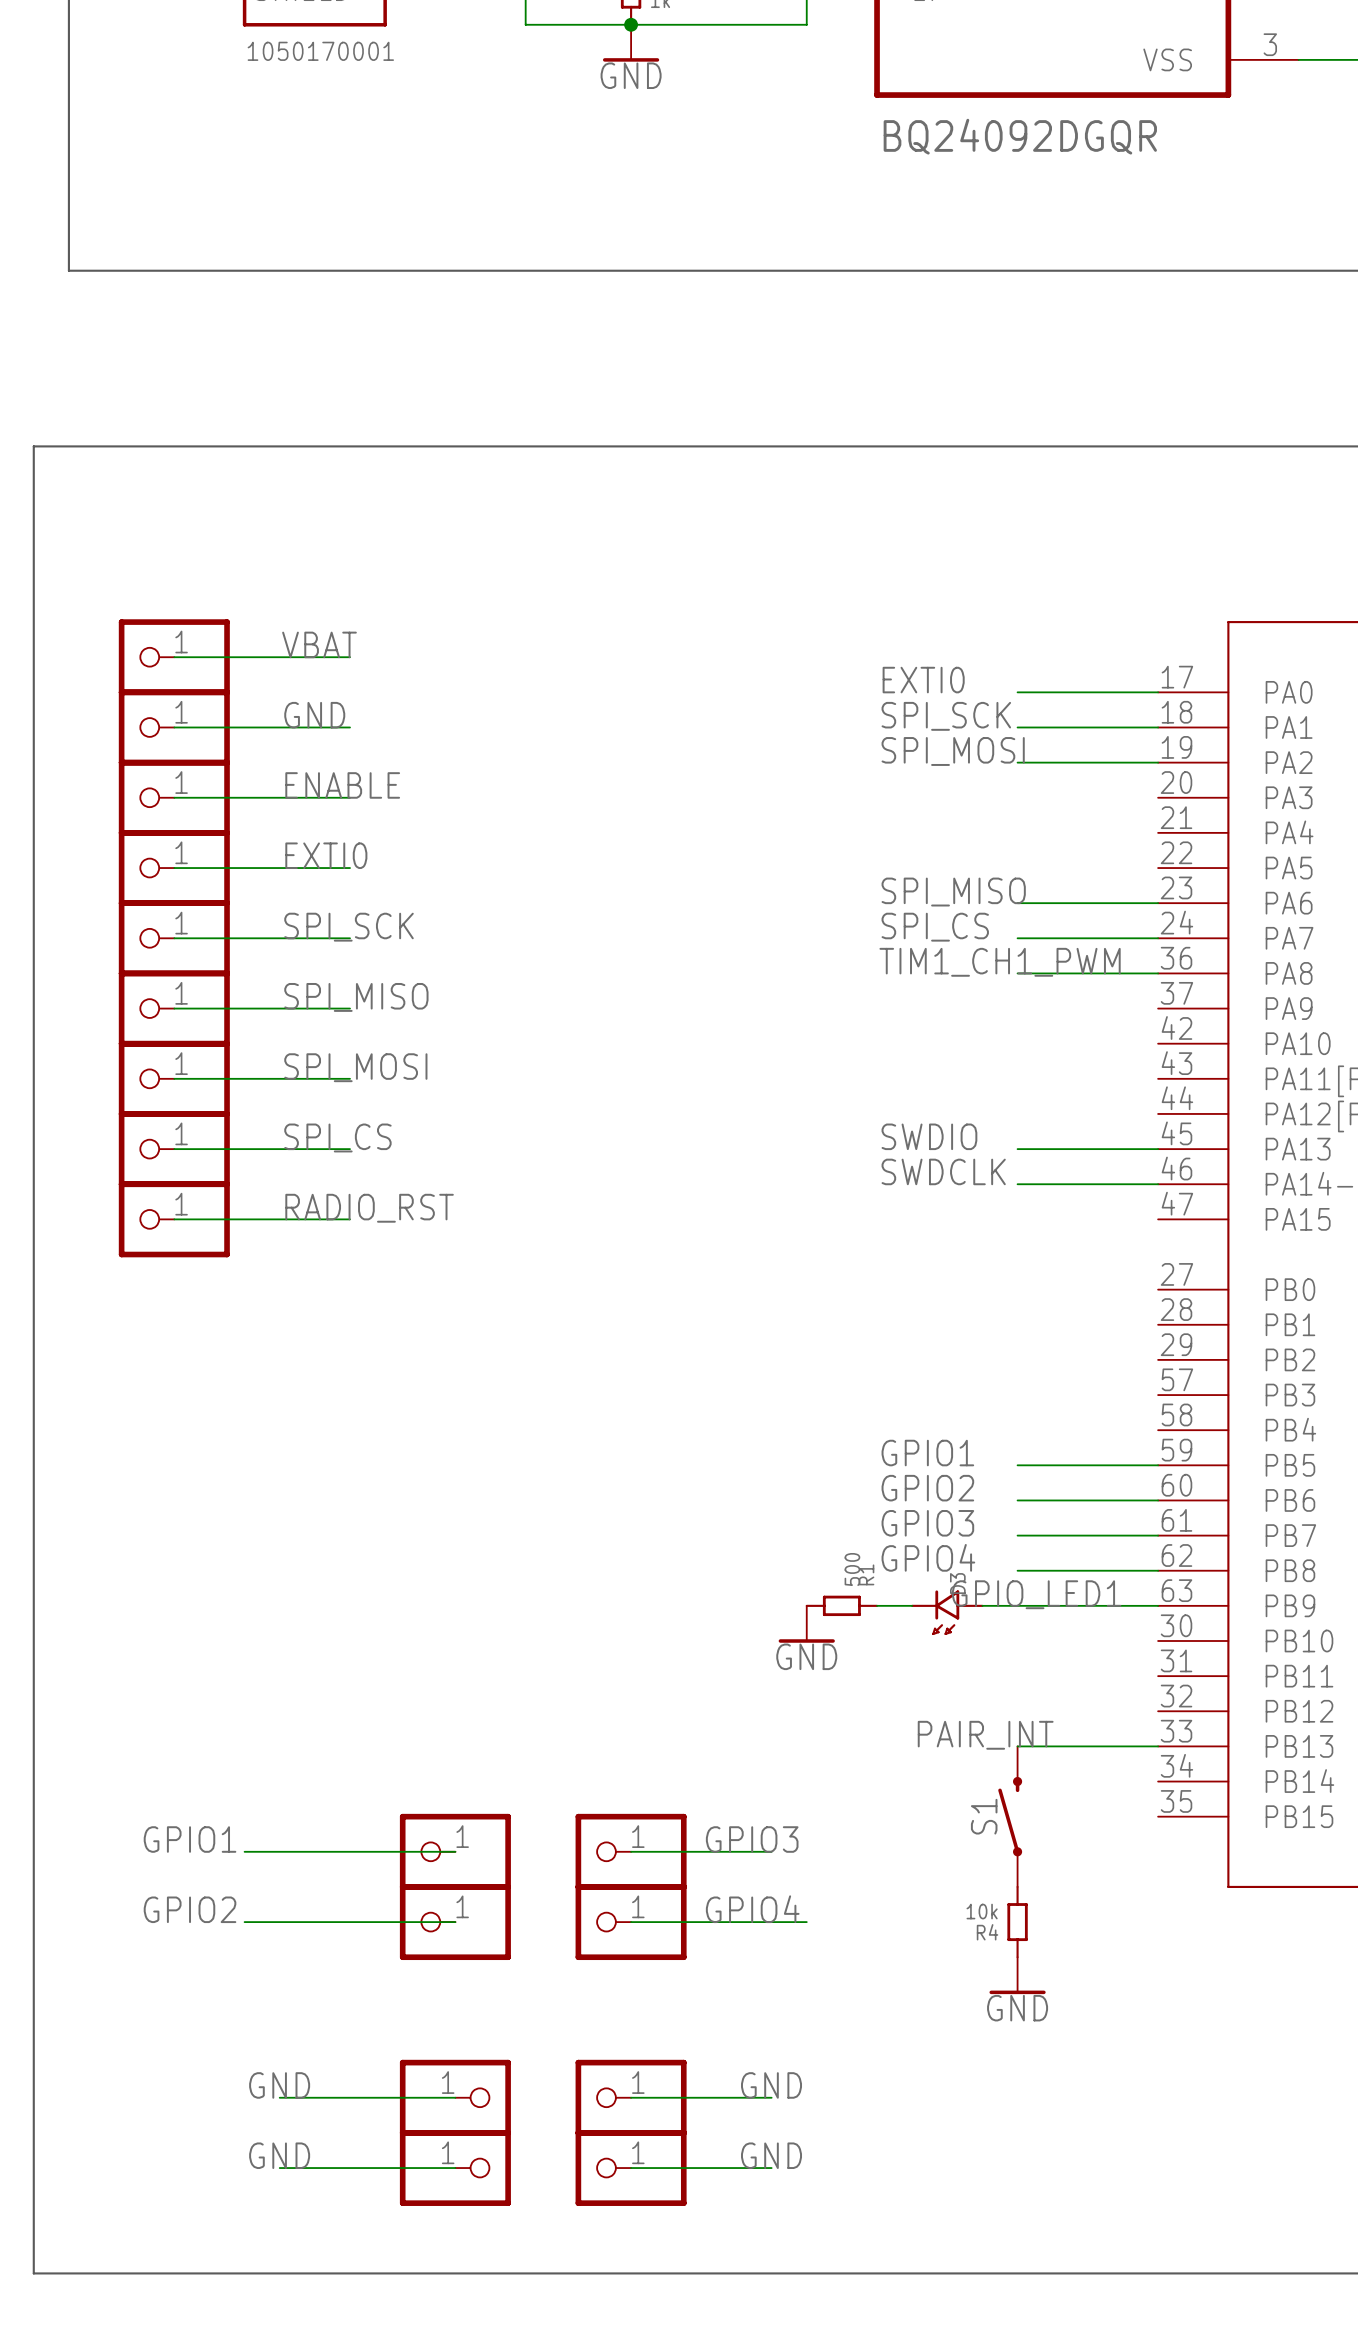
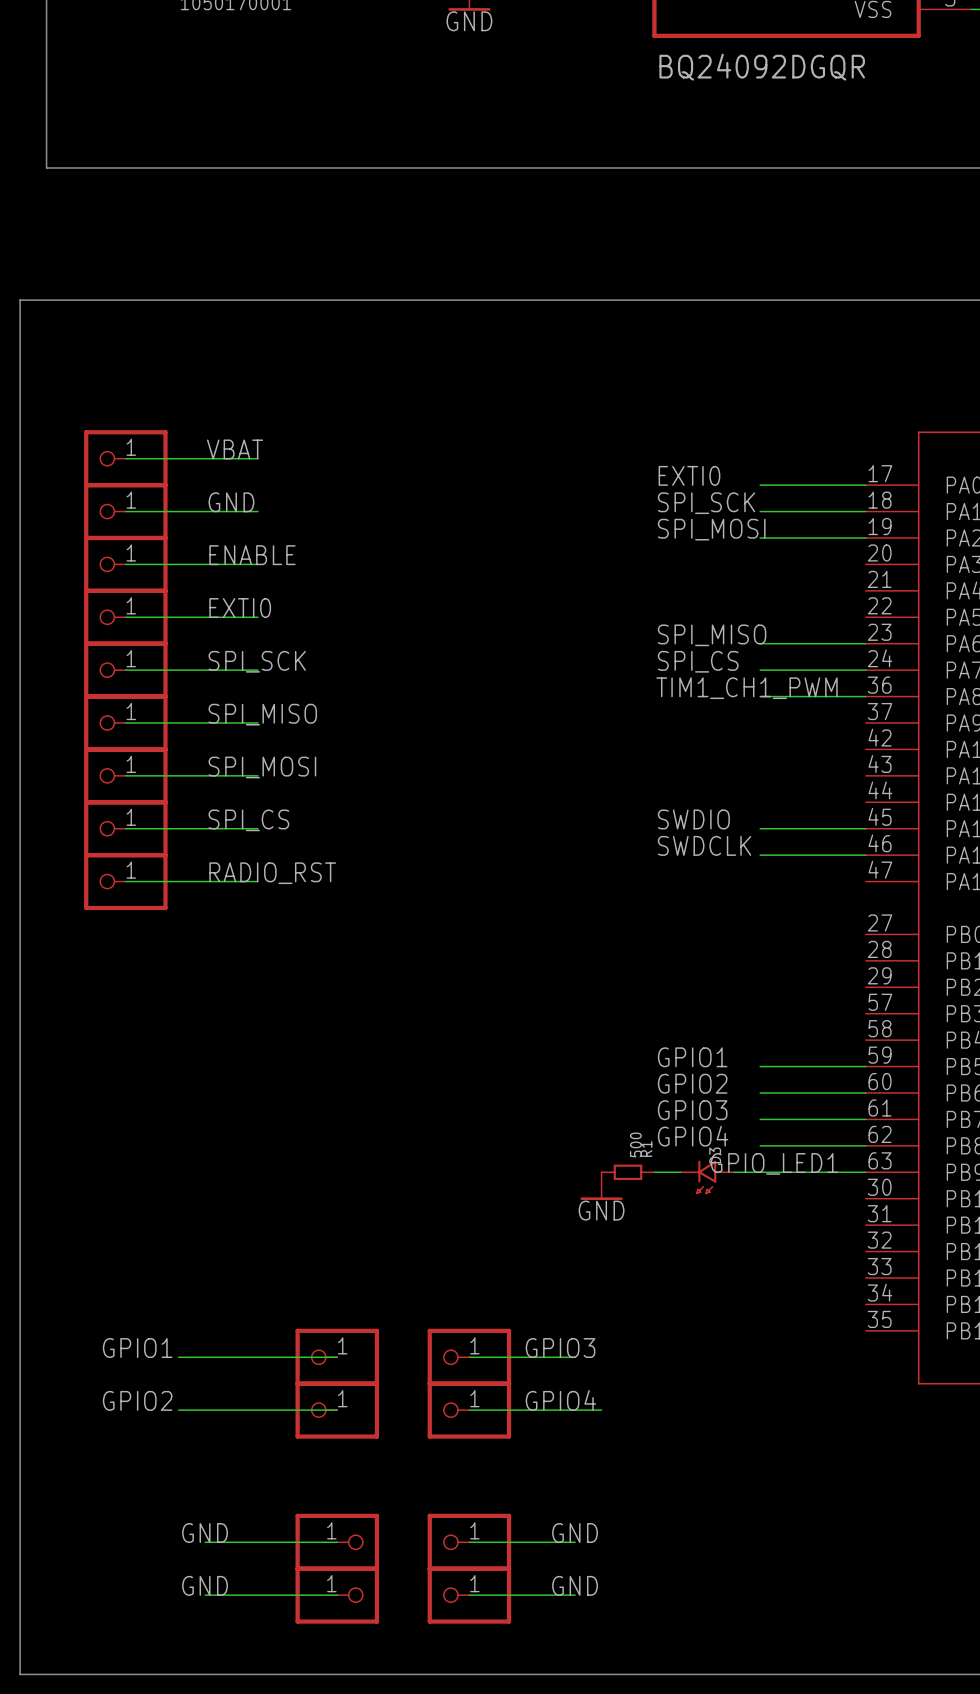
label: PAIR_INT (985, 1735) -> none
wire: (1017, 1746) (1158, 1746) -> none
S1: (1010, 1816) -> none
R4: 10k (1017, 1922) -> none
power symbol: GND (1017, 1975) -> none

